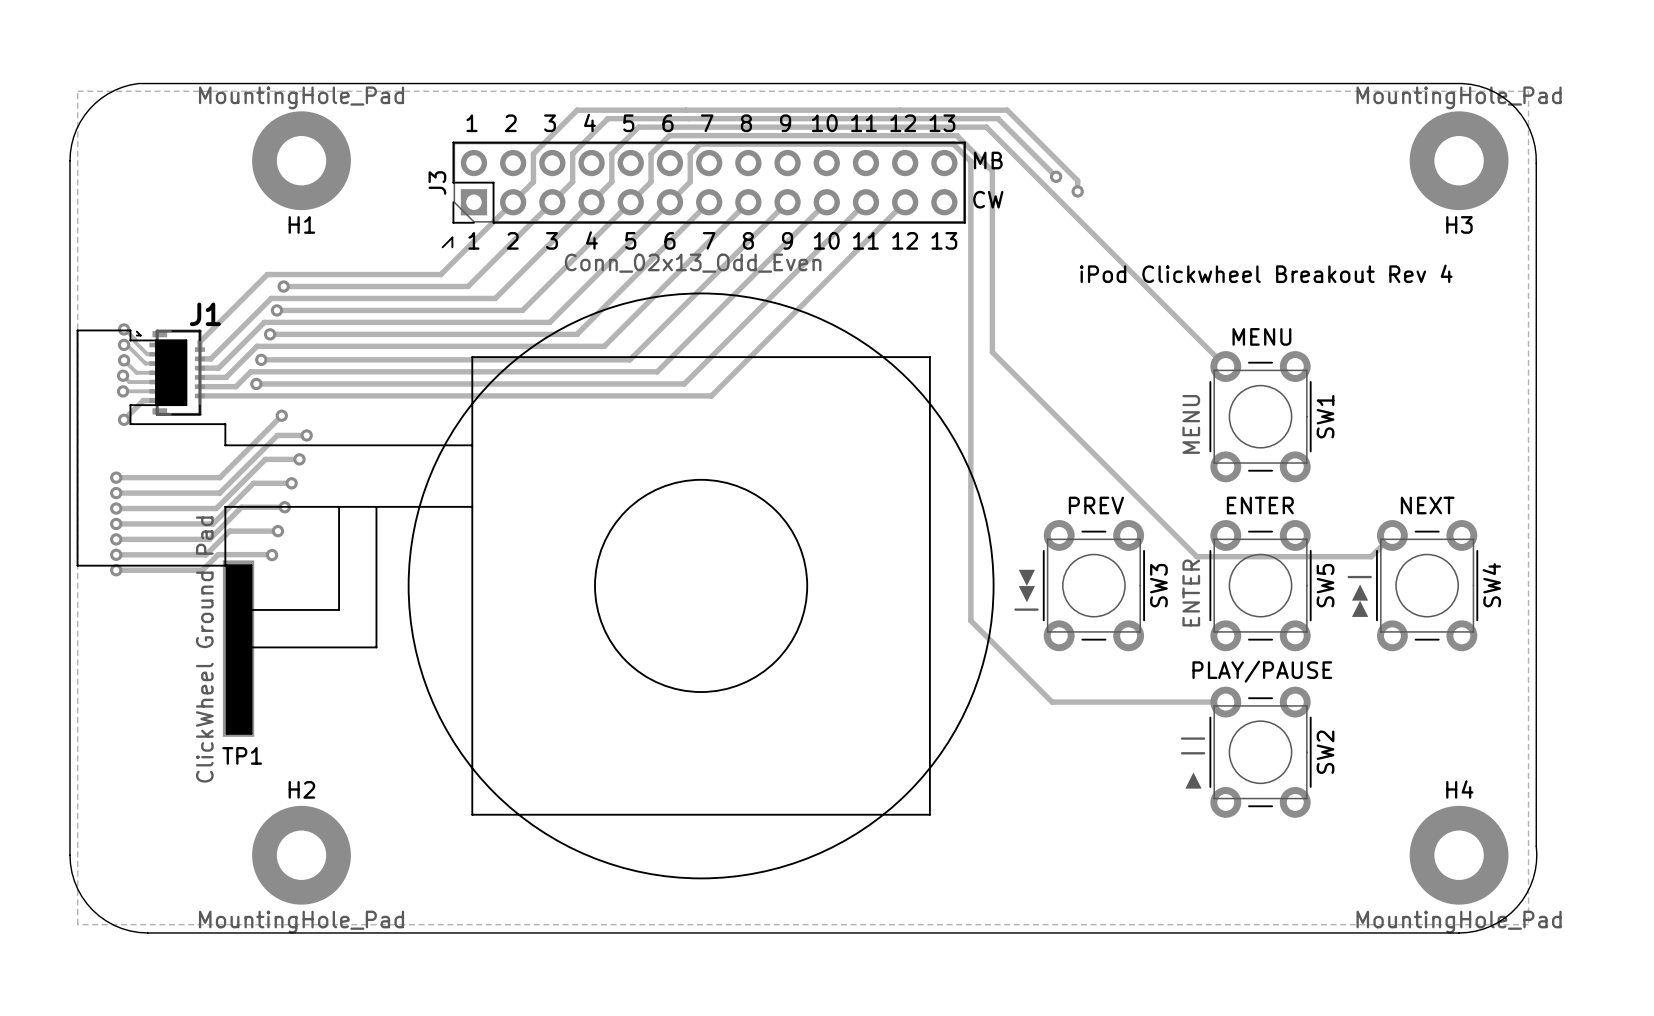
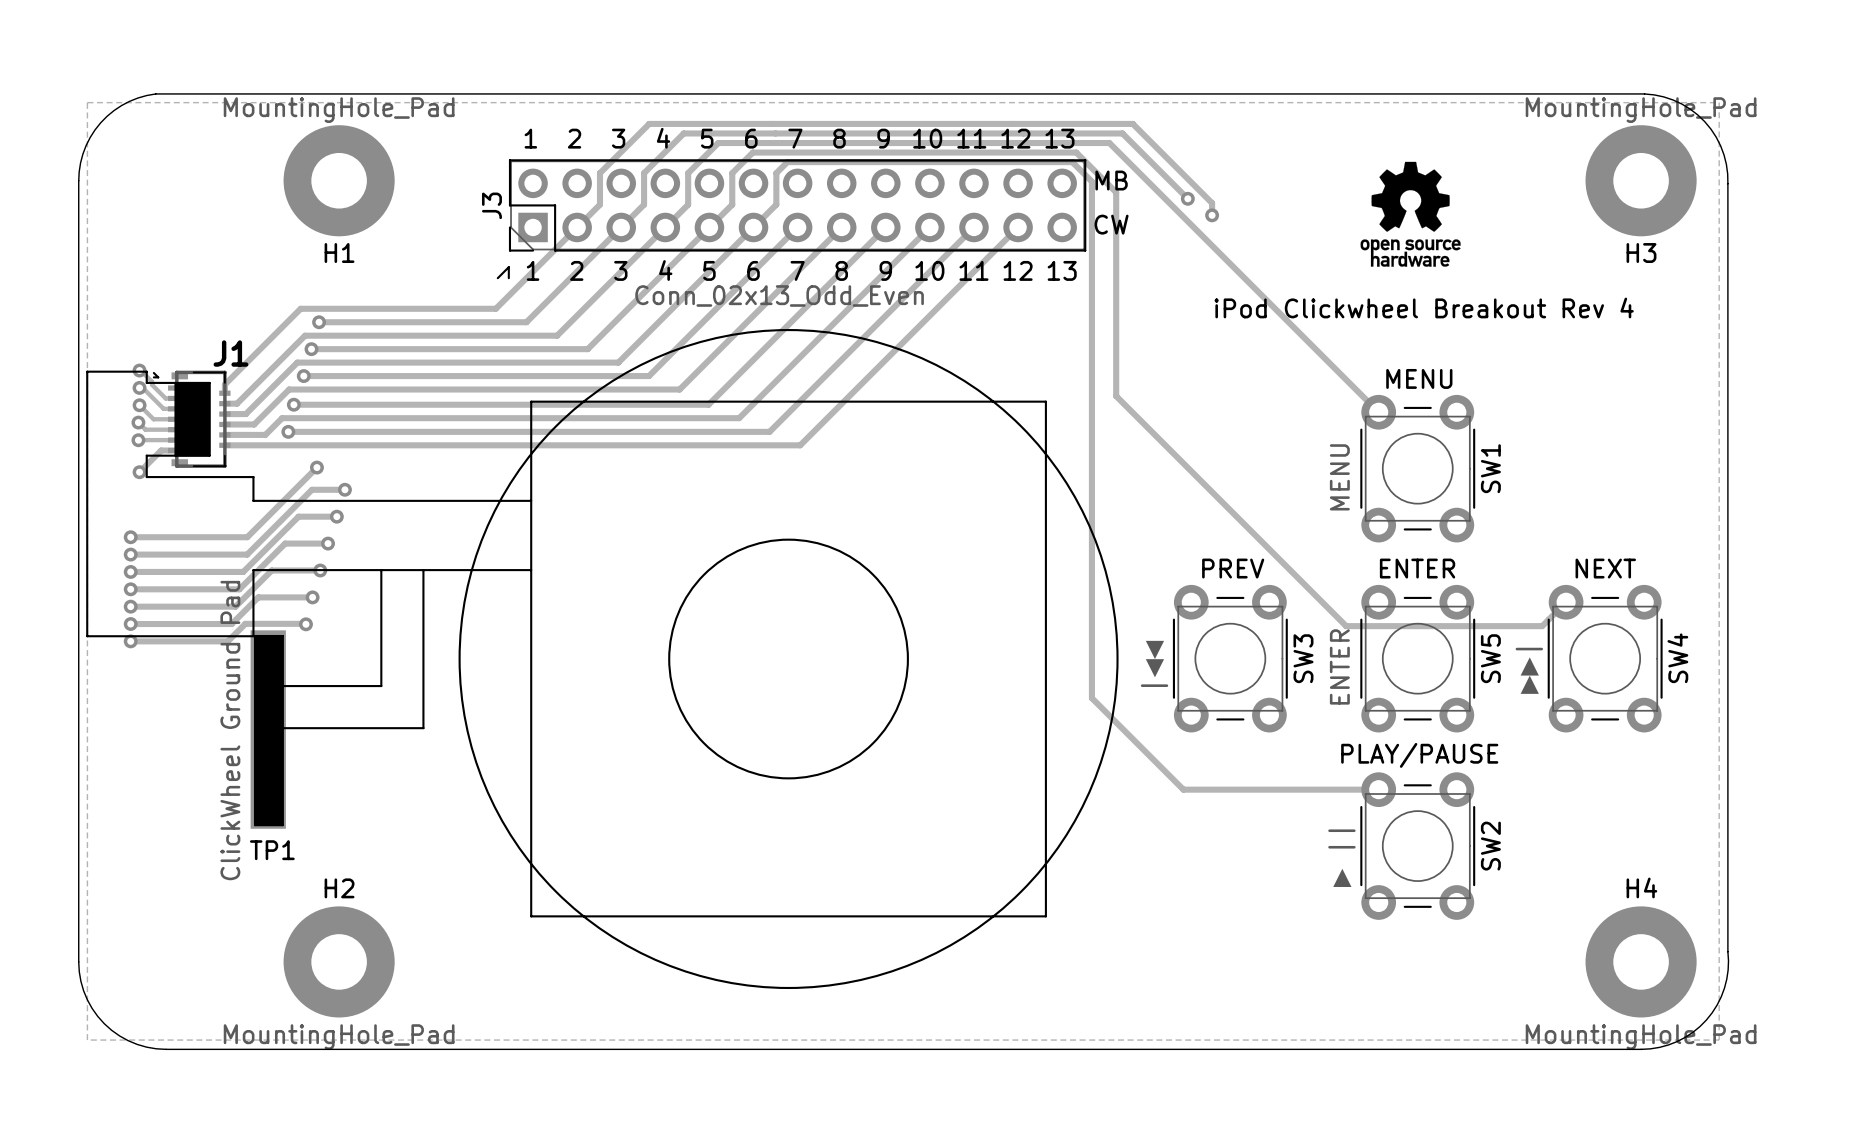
drawing: none -> [1360, 161, 1461, 267]

